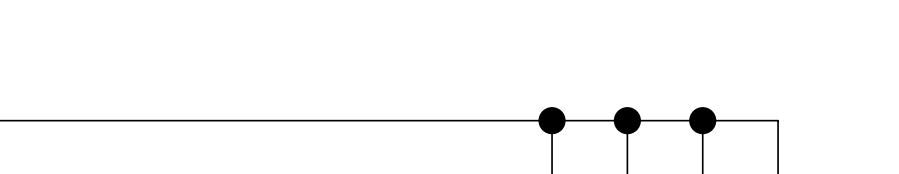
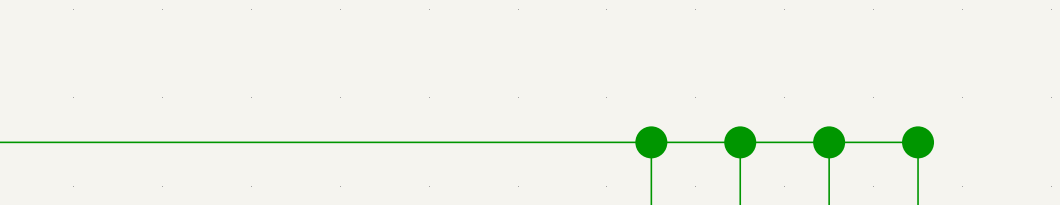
junction: none -> (918, 142)

